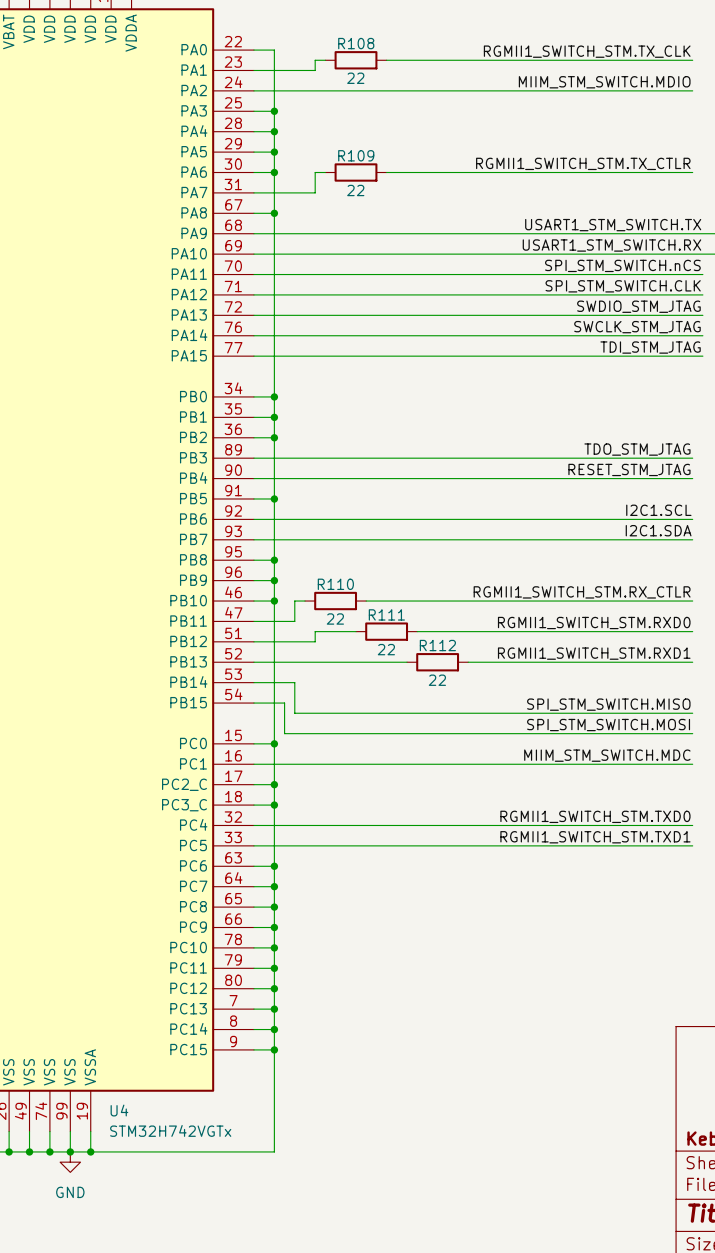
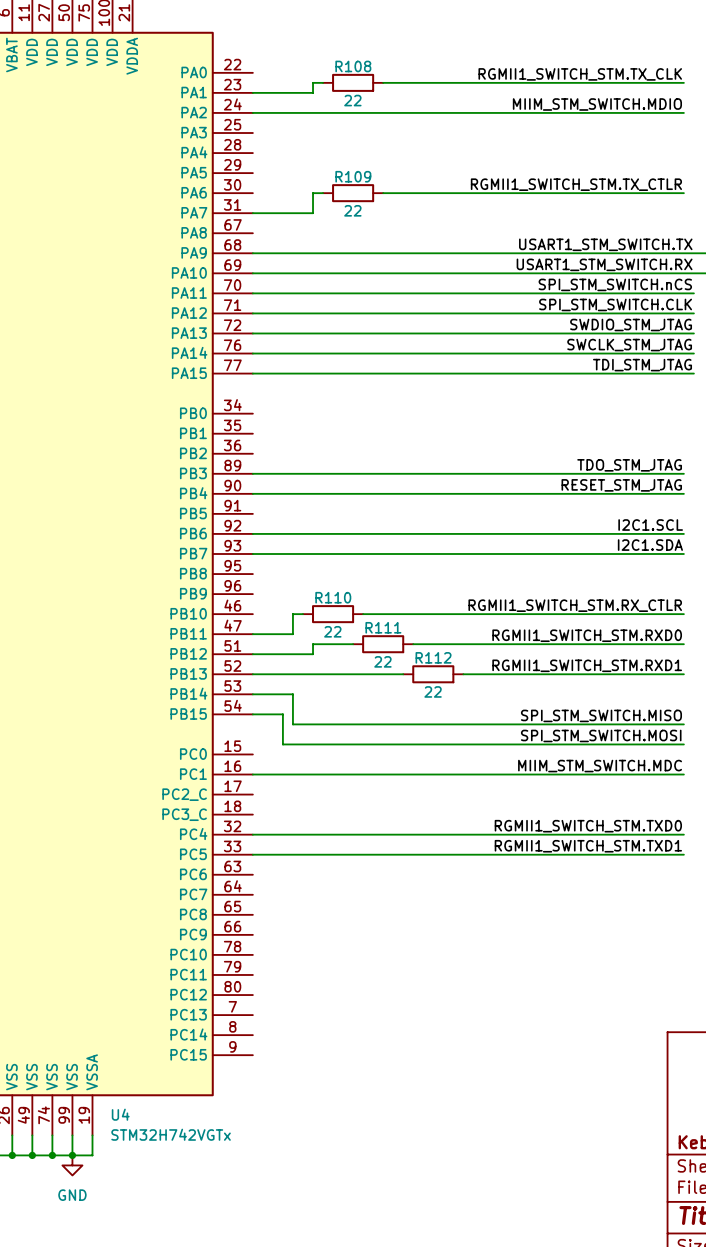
wire: (253, 50) (274, 50) (274, 1151) (90, 1151) -> none
wire: (253, 111) (274, 111) -> none
junction: (274, 111) -> none
wire: (253, 131) (274, 131) -> none
junction: (274, 131) -> none
wire: (253, 152) (274, 152) -> none
junction: (274, 152) -> none
wire: (253, 172) (274, 172) -> none
junction: (274, 172) -> none
wire: (253, 213) (274, 213) -> none
junction: (274, 213) -> none
wire: (253, 396) (274, 396) -> none
junction: (274, 396) -> none
wire: (253, 417) (274, 417) -> none
junction: (274, 417) -> none
wire: (253, 437) (274, 437) -> none
junction: (274, 437) -> none
wire: (253, 498) (274, 498) -> none
junction: (274, 498) -> none
wire: (253, 560) (274, 560) -> none
junction: (274, 560) -> none
wire: (253, 580) (274, 580) -> none
junction: (274, 580) -> none
wire: (253, 601) (274, 601) -> none
junction: (274, 601) -> none
wire: (253, 743) (274, 743) -> none
junction: (274, 743) -> none
wire: (253, 784) (274, 784) -> none
junction: (274, 784) -> none
wire: (253, 805) (274, 805) -> none
junction: (274, 805) -> none
wire: (253, 866) (274, 866) -> none
junction: (274, 866) -> none
wire: (253, 886) (274, 886) -> none
junction: (274, 886) -> none
wire: (253, 907) (274, 907) -> none
junction: (274, 907) -> none
wire: (253, 927) (274, 927) -> none
junction: (274, 927) -> none
wire: (253, 947) (274, 947) -> none
junction: (274, 947) -> none
wire: (253, 968) (274, 968) -> none
junction: (274, 968) -> none
wire: (253, 988) (274, 988) -> none
junction: (274, 988) -> none
wire: (253, 1009) (274, 1009) -> none
junction: (274, 1009) -> none
wire: (253, 1029) (274, 1029) -> none
junction: (274, 1029) -> none
wire: (253, 1049) (274, 1049) -> none
junction: (274, 1049) -> none
junction: (90, 1151) -> none

